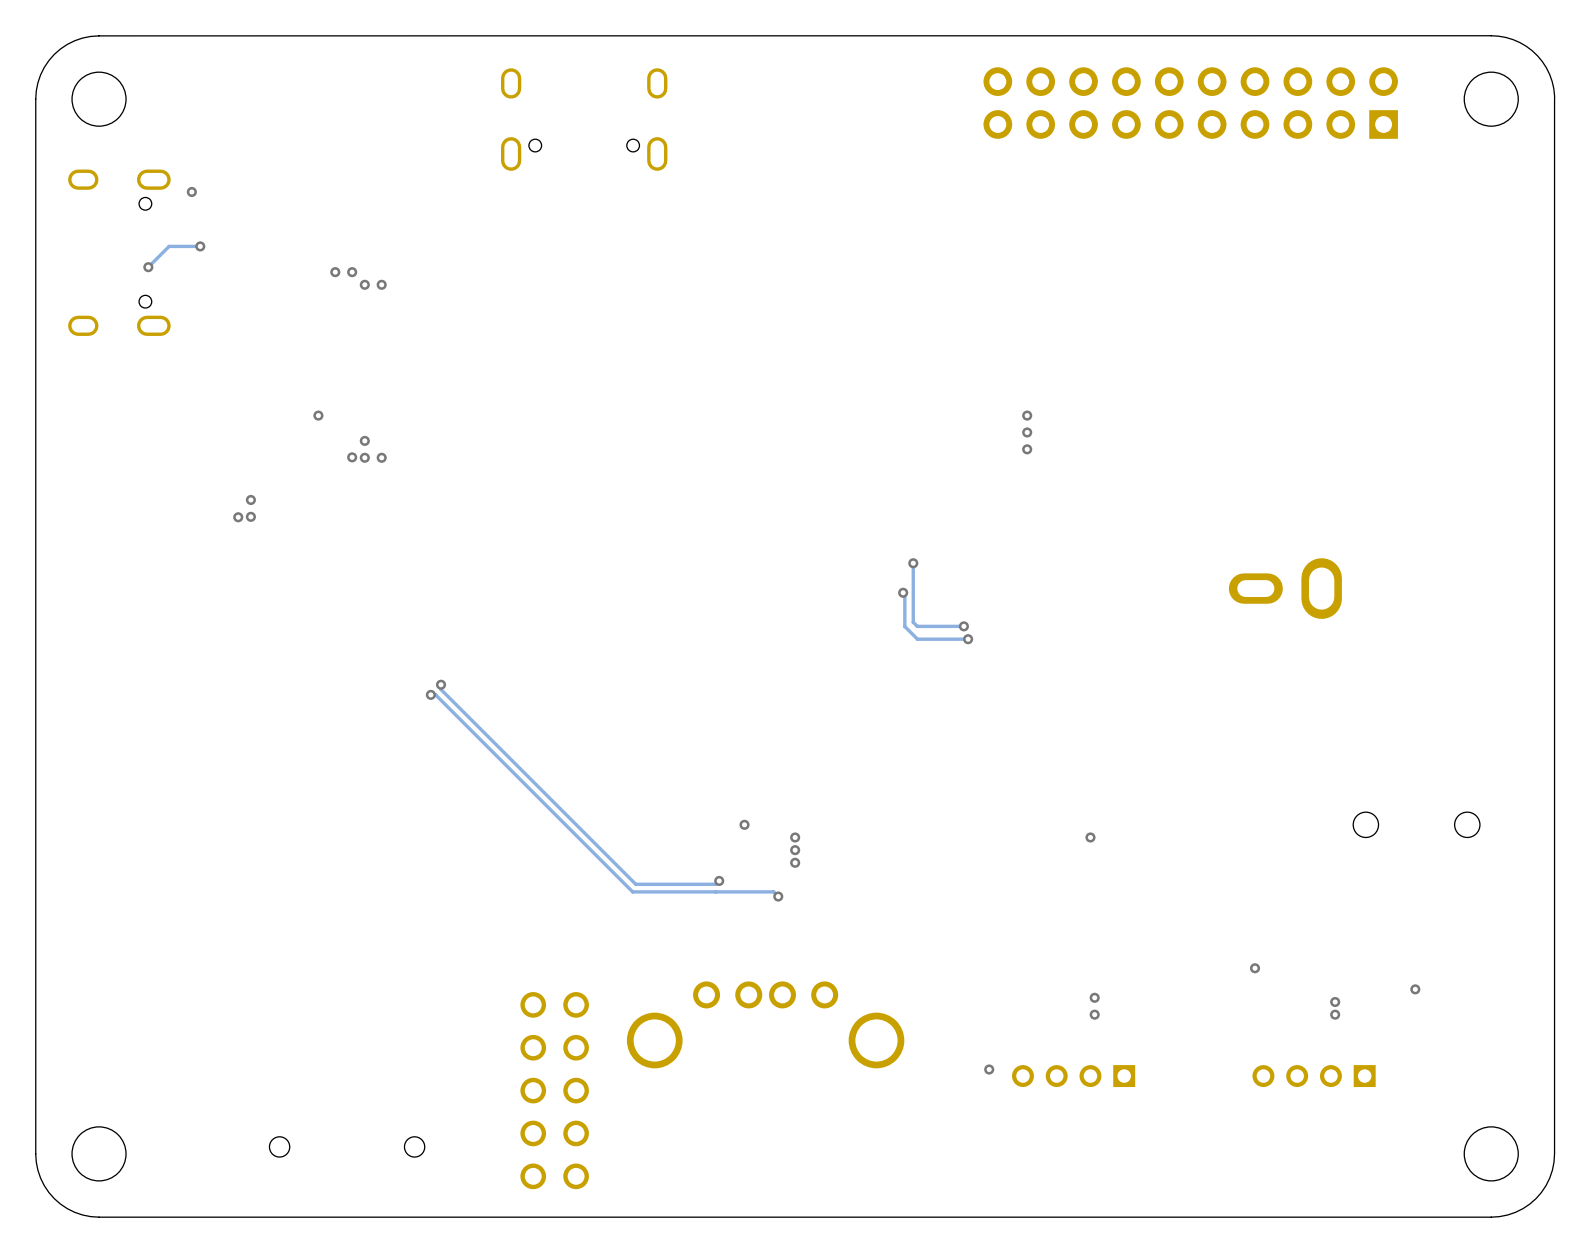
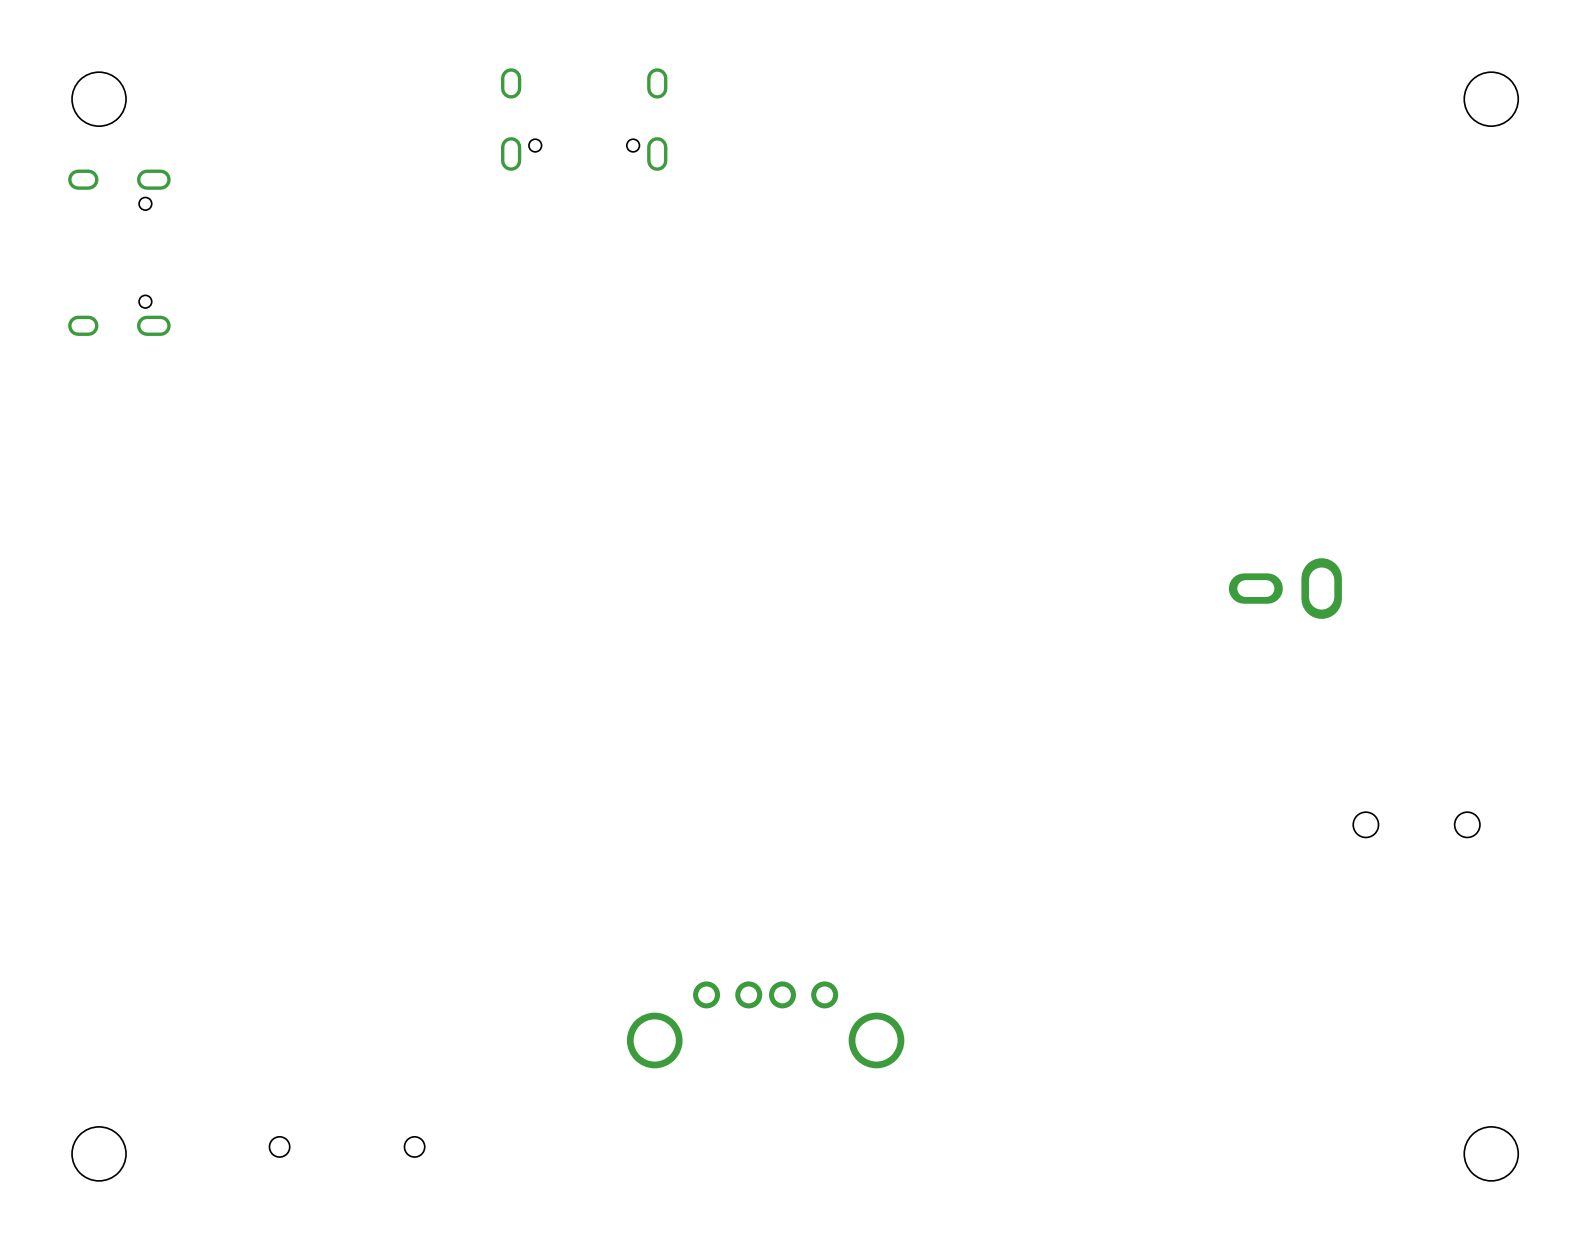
board edge: (1491, 35) (99, 35) (82, 38) (60, 48) (44, 67) (37, 82) (35, 99) (35, 1153) (40, 1178) (48, 1192) (67, 1208) (82, 1215) (99, 1217) (1491, 1217) (1515, 1212) (1529, 1204) (1546, 1185) (1552, 1170) (1554, 1153) (1554, 95) (1552, 81) (1546, 67) (1532, 50) (1513, 39) (1491, 35) -> none
part: (1190, 103) -> none
via: (191, 191) -> none
track: (200, 246) (169, 246) (148, 267) -> none
via: (200, 246) -> none
via: (148, 267) -> none
via: (335, 272) -> none
via: (352, 272) -> none
via: (364, 284) -> none
via: (381, 284) -> none
via: (318, 415) -> none
via: (1027, 415) -> none
via: (1027, 432) -> none
via: (364, 440) -> none
via: (1027, 449) -> none
via: (352, 457) -> none
via: (364, 457) -> none
via: (381, 457) -> none
via: (250, 499) -> none
via: (250, 516) -> none
via: (238, 517) -> none
track: (913, 563) (913, 622) (917, 626) (963, 626) -> none
via: (913, 563) -> none
track: (903, 592) (904, 594) (904, 626) (917, 639) (968, 639) -> none
via: (903, 592) -> none
via: (963, 626) -> none
via: (968, 639) -> none
track: (441, 684) (441, 689) (635, 884) (715, 884) (719, 880) -> none
via: (441, 684) -> none
track: (430, 694) (435, 694) (632, 891) (773, 891) (778, 896) -> none
via: (430, 694) -> none
via: (744, 824) -> none
via: (795, 837) -> none
via: (1090, 837) -> none
via: (795, 850) -> none
via: (795, 862) -> none
via: (719, 880) -> none
via: (778, 896) -> none
via: (1255, 968) -> none
via: (1415, 989) -> none
via: (1094, 997) -> none
via: (1335, 1002) -> none
via: (1094, 1014) -> none
via: (1335, 1014) -> none
via: (989, 1069) -> none
part: (1073, 1076) -> none
part: (1314, 1076) -> none
part: (554, 1090) -> none

